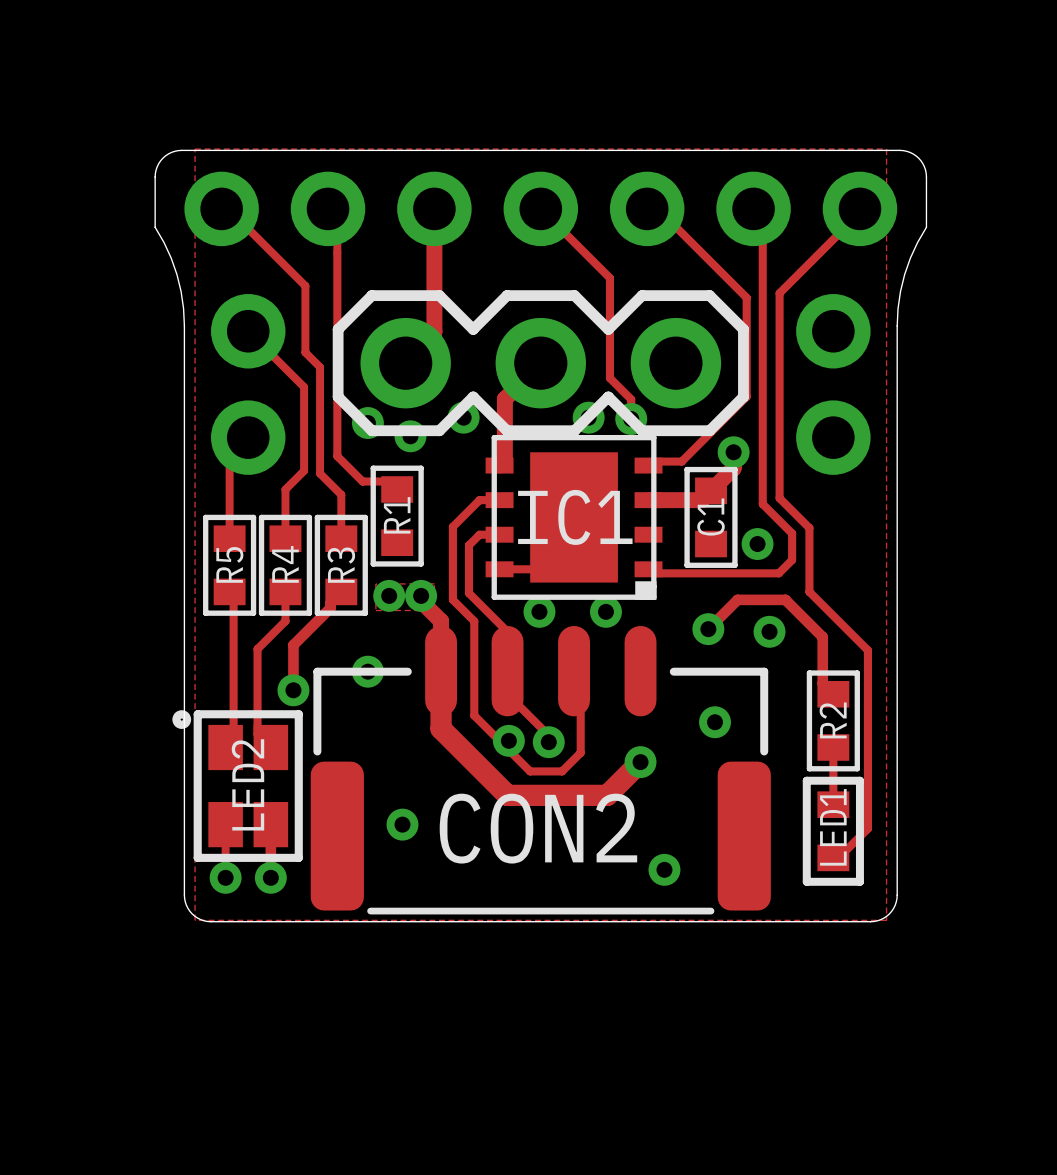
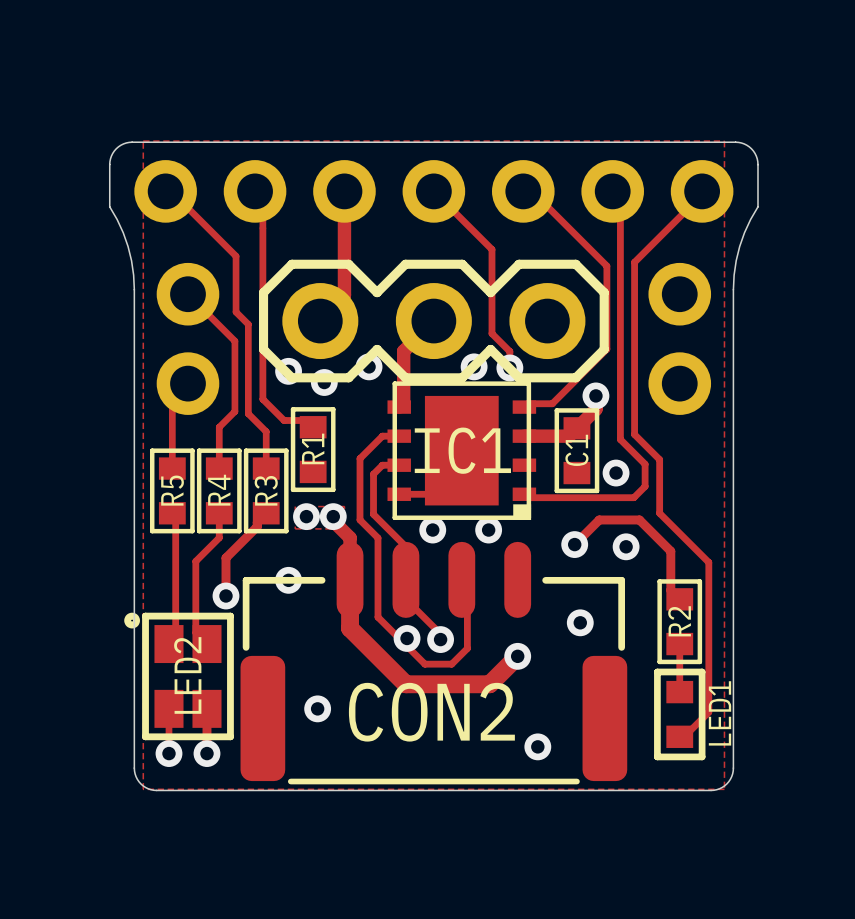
LED1 name position: LED1 (833, 827) -> LED1 (719, 713)

